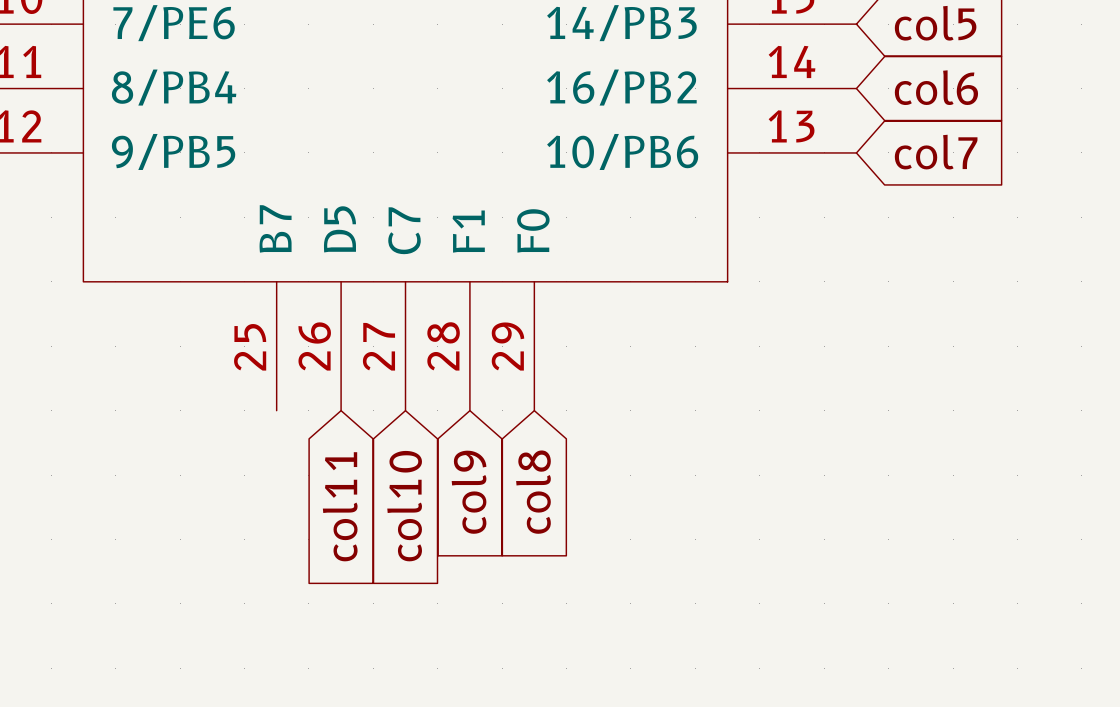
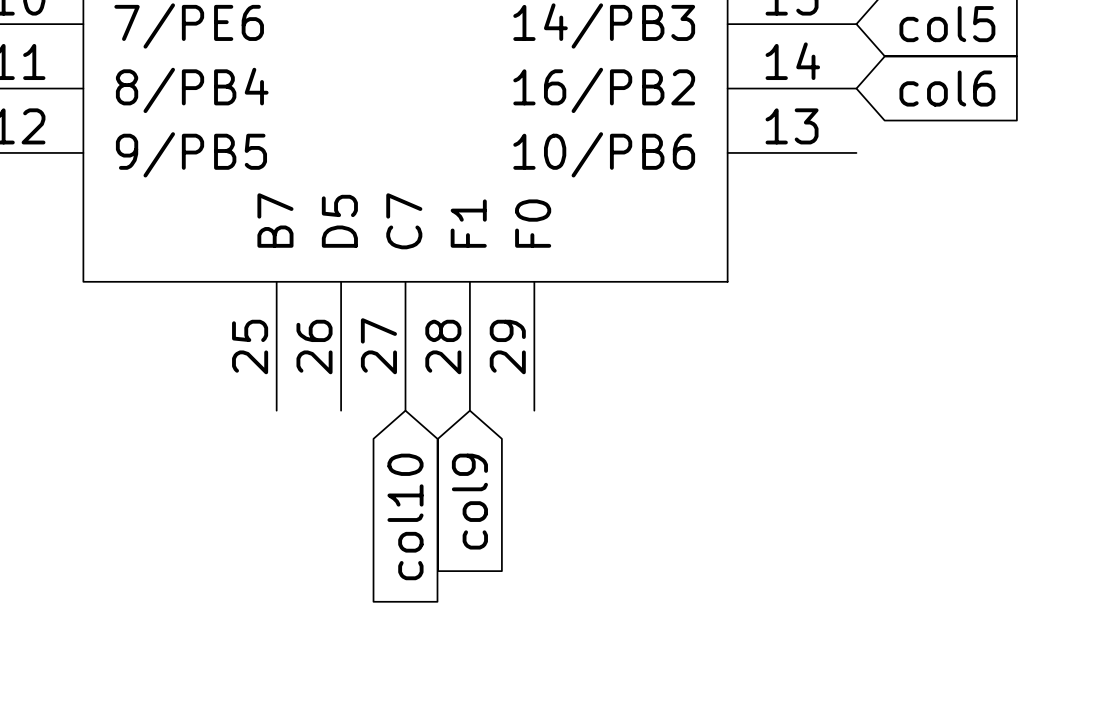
global label: col7 (936, 152) -> none
global label: col8 (533, 492) -> none
global label: col11 (340, 506) -> none

